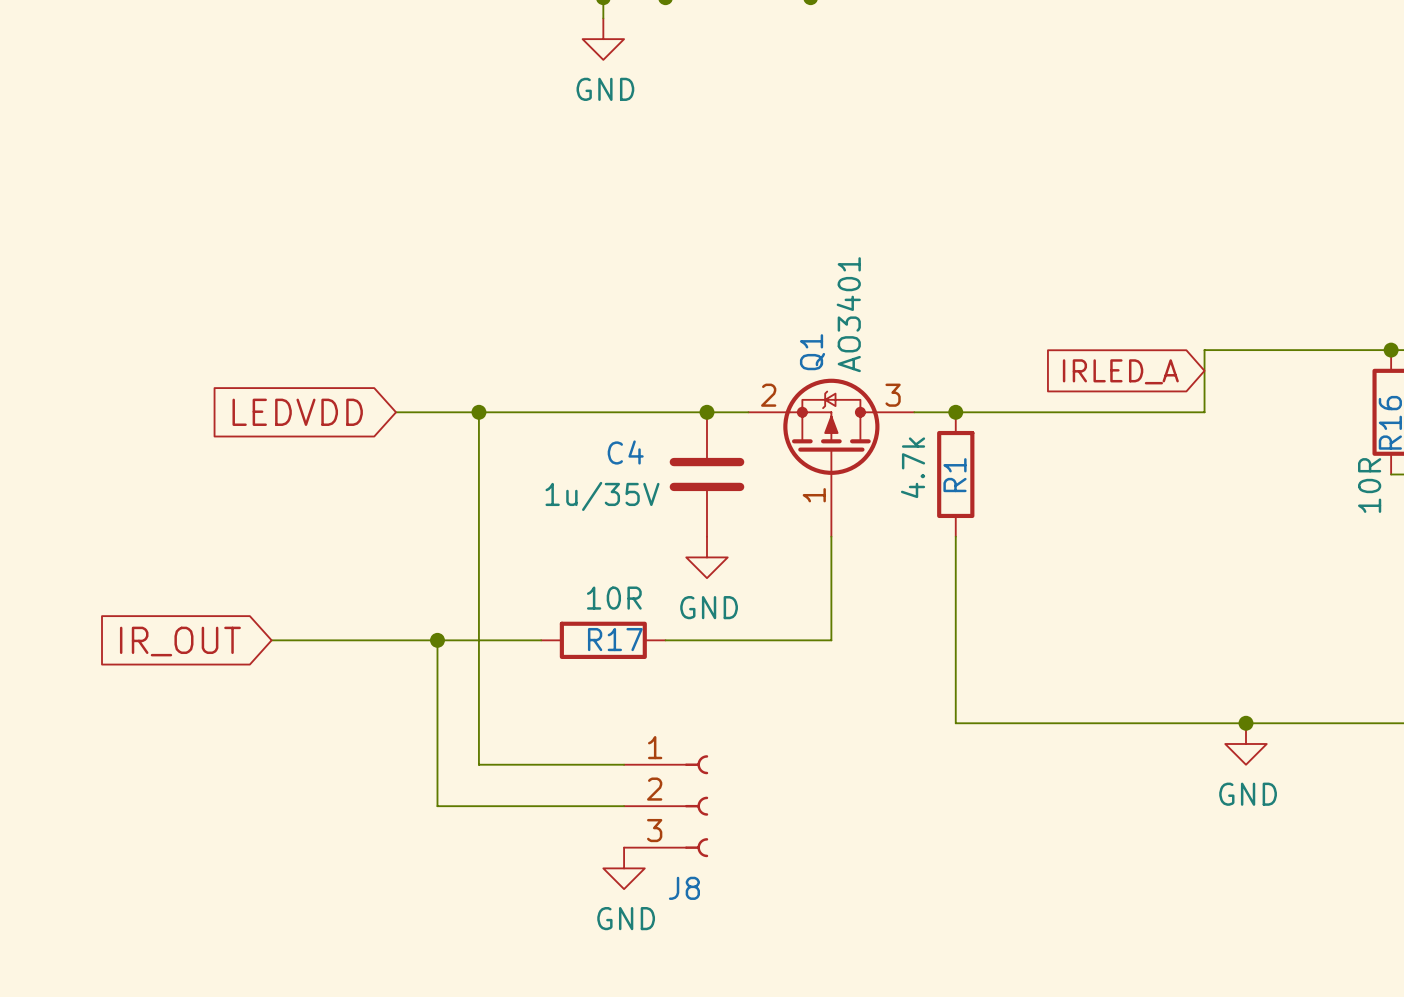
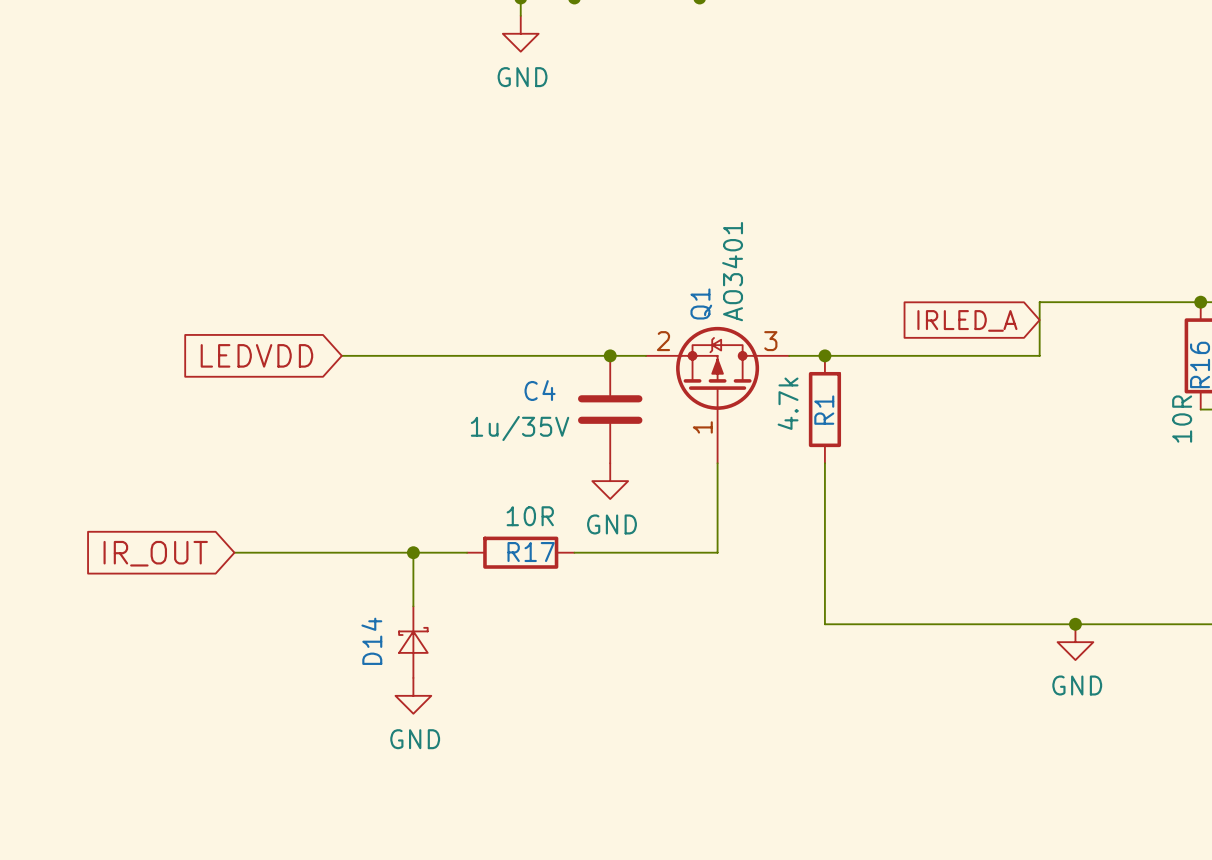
wire: (478, 412) (478, 640) -> none
junction: (478, 412) -> none
wire: (437, 640) (437, 806) (624, 806) -> none
junction position: (437, 640) -> (413, 552)
wire: (478, 702) (478, 764) (624, 764) -> none
D14: none -> (413, 642)
J8: (666, 806) -> none
power symbol position: GND (624, 868) -> GND (413, 695)

